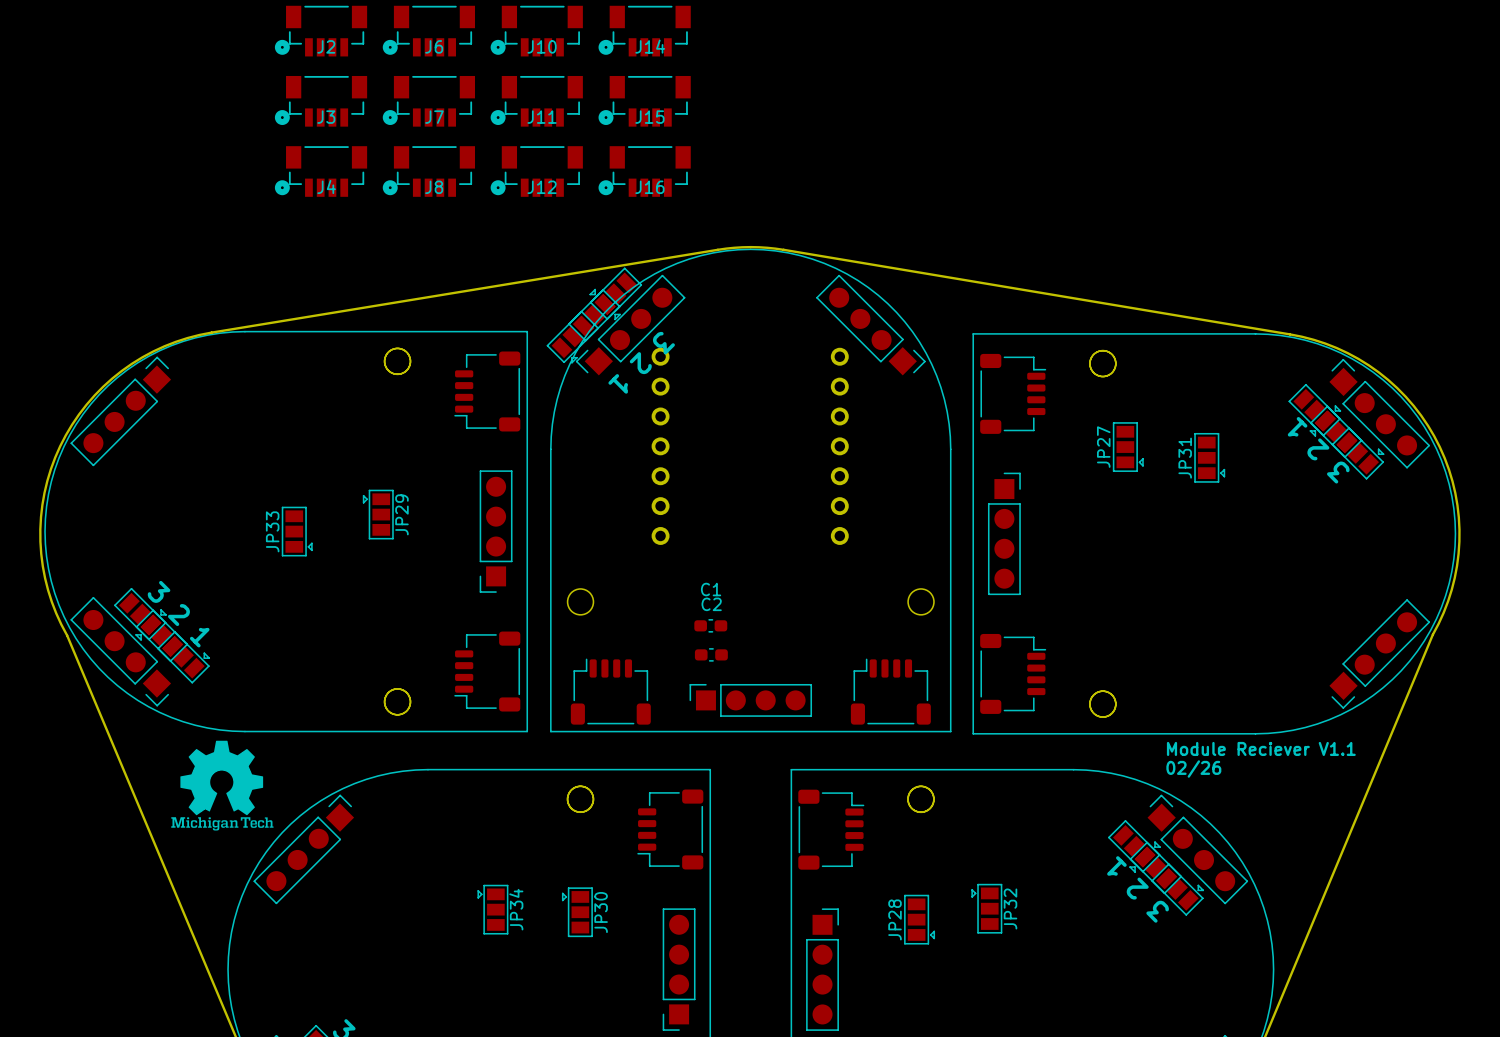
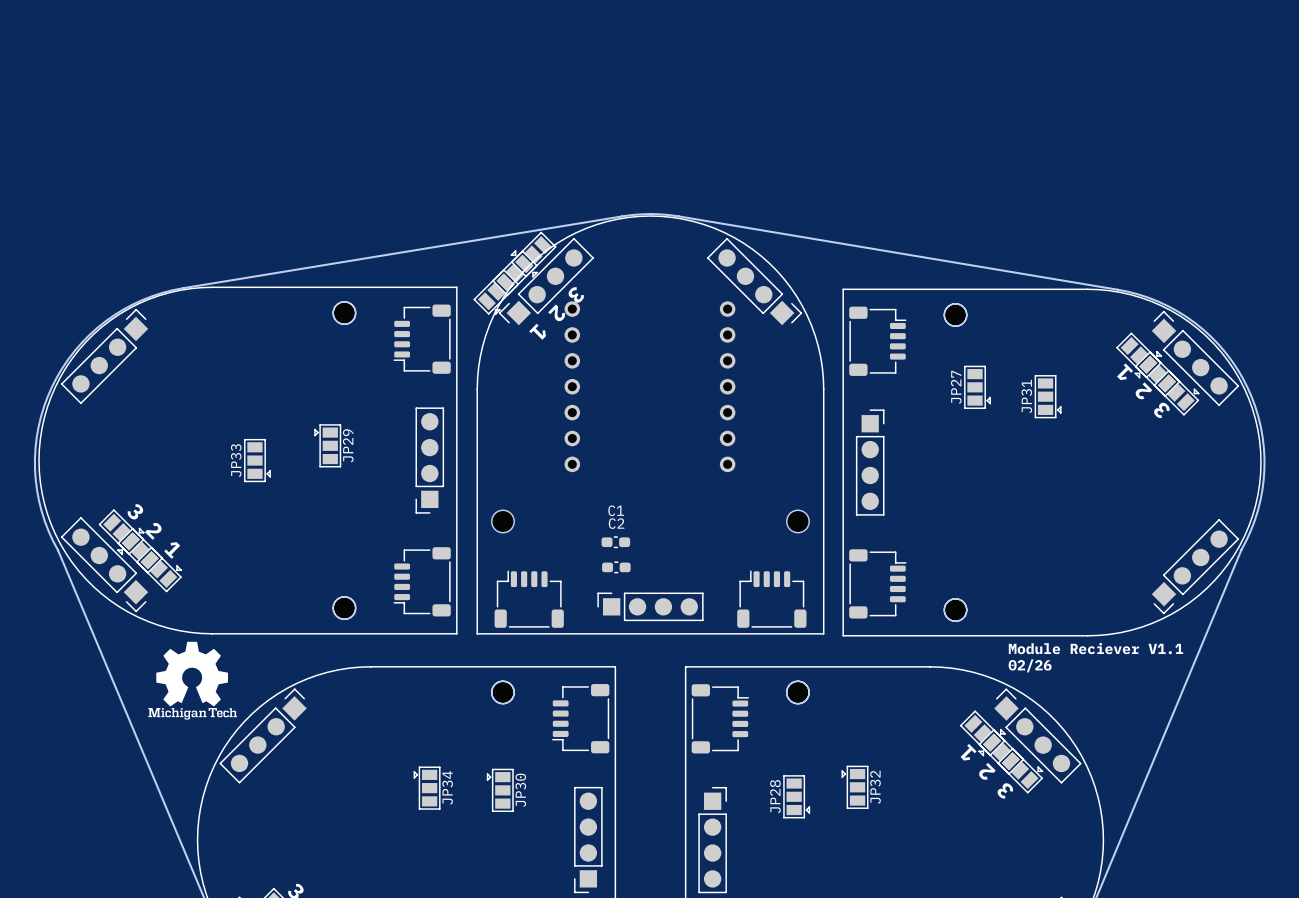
J2: (321, 31) -> none
J6: (428, 31) -> none
J10: (536, 31) -> none
J14: (644, 31) -> none
J3: (321, 101) -> none
J7: (428, 101) -> none
J11: (536, 101) -> none
J15: (644, 101) -> none
J4: (321, 171) -> none
J8: (428, 171) -> none
J12: (536, 171) -> none
J16: (644, 171) -> none

